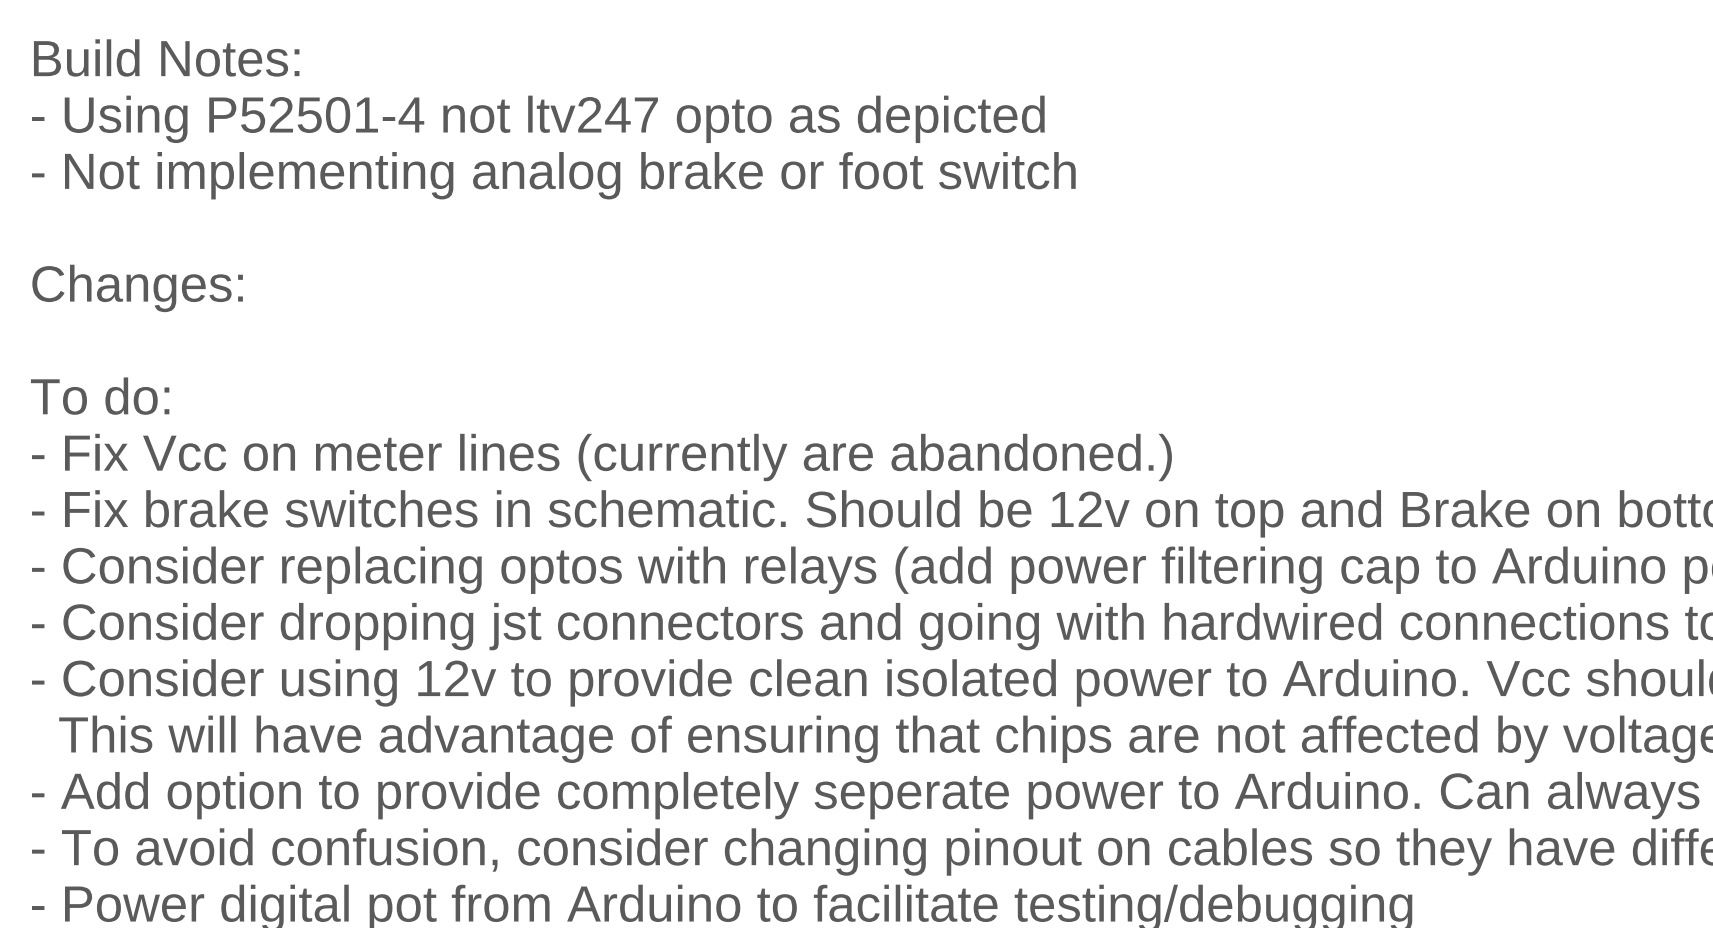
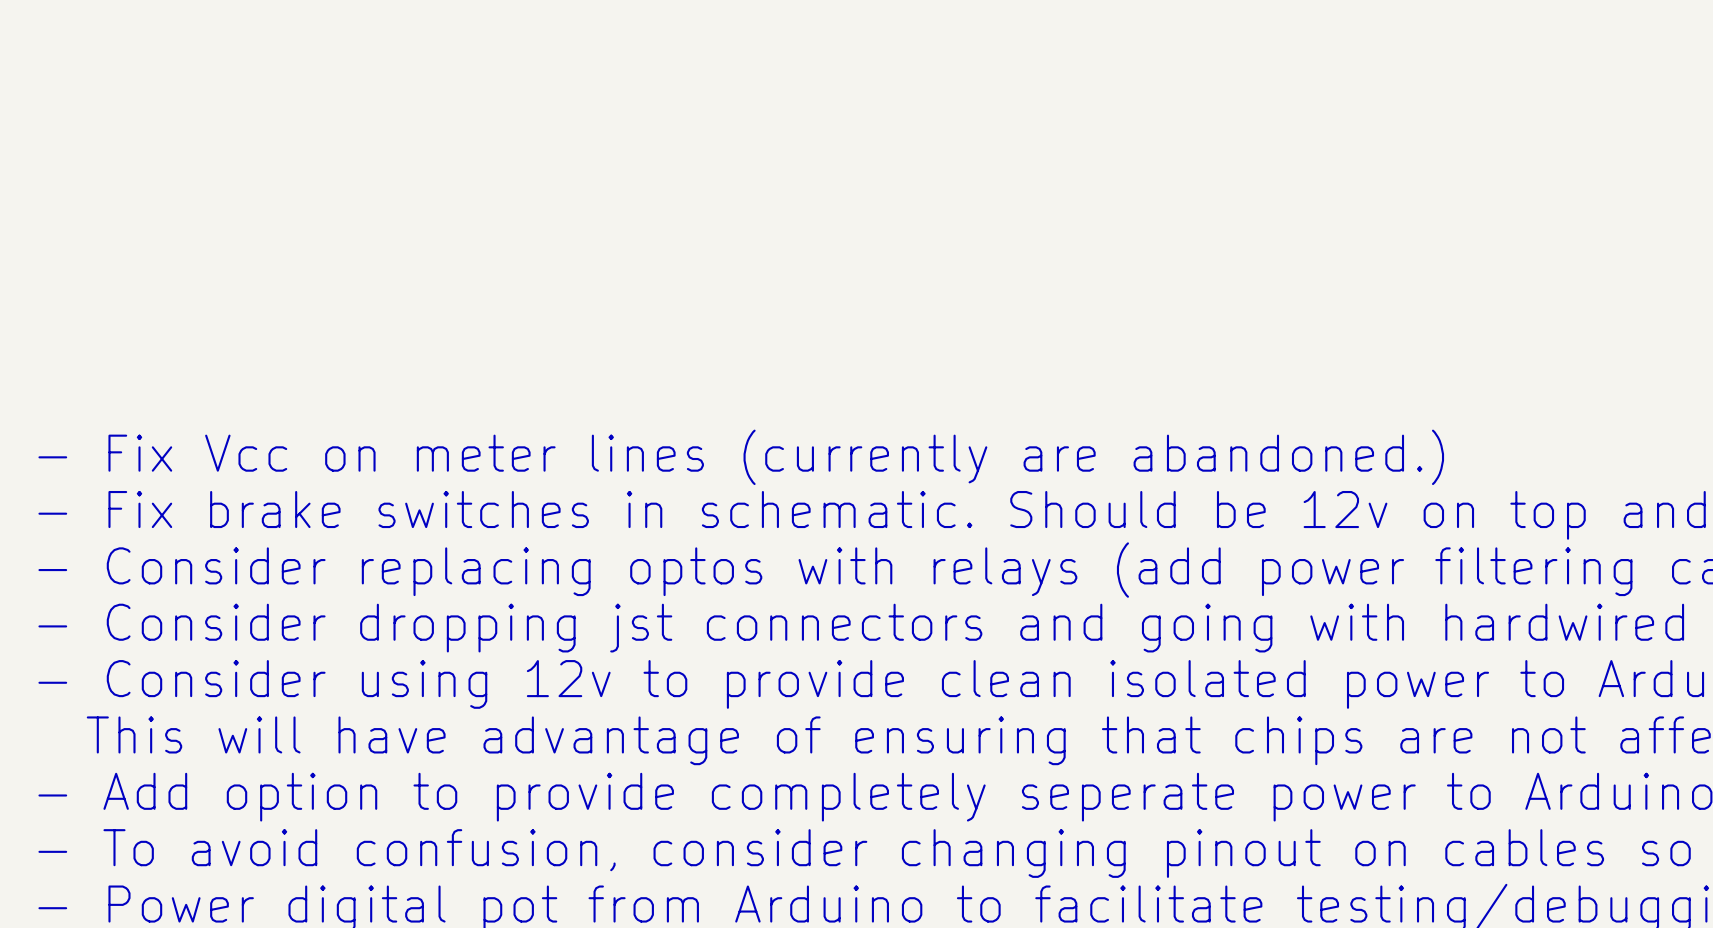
text: Build Notes: (166, 57) -> none
text: - Using P52501-4 not ltv247 opto as depicted (538, 119) -> none
text: - Not implementing analog brake or foot switch (553, 175) -> none
text: Changes: (137, 288) -> none
text: To do: (100, 396) -> none

